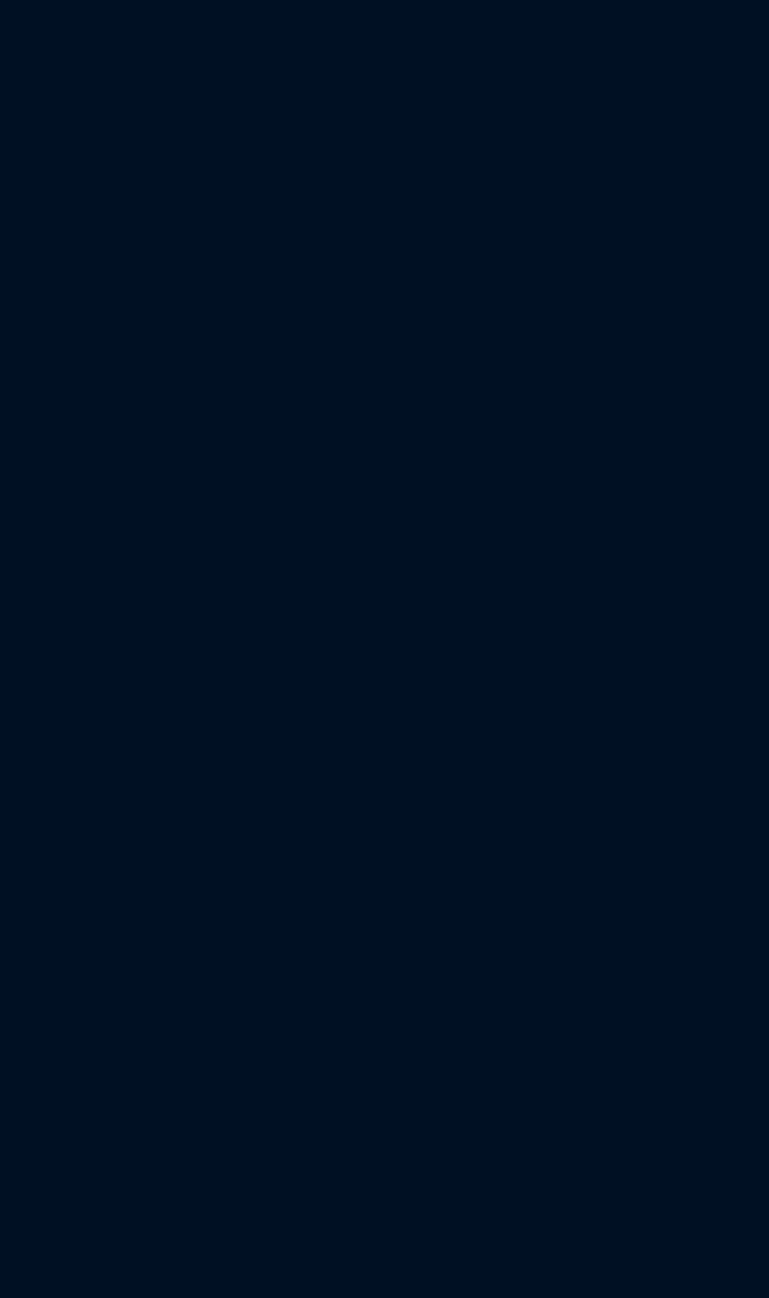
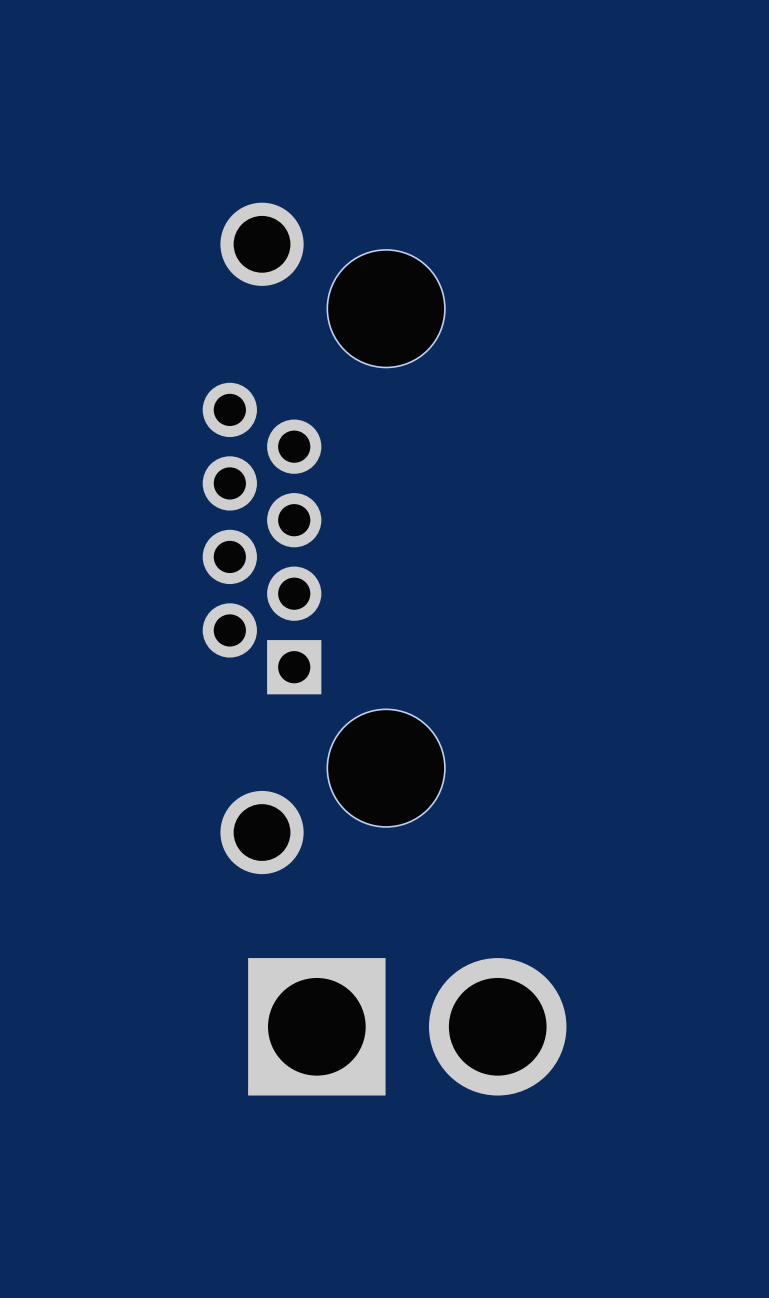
part: none -> (323, 538)
part: none -> (407, 1026)

